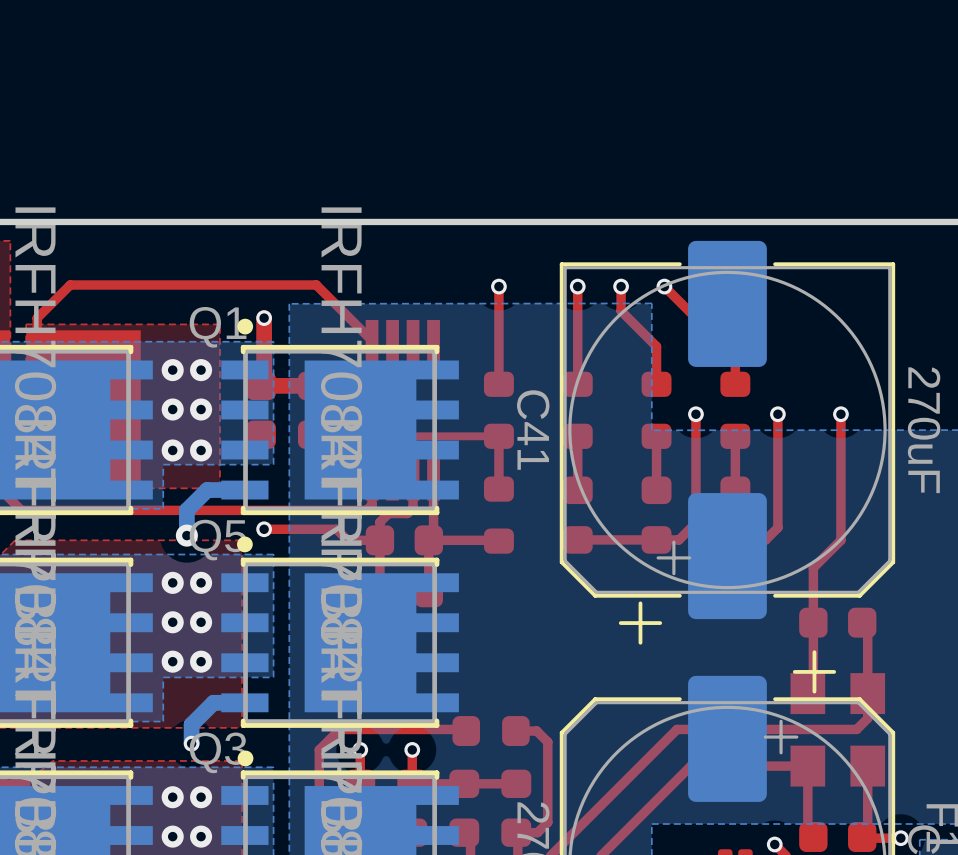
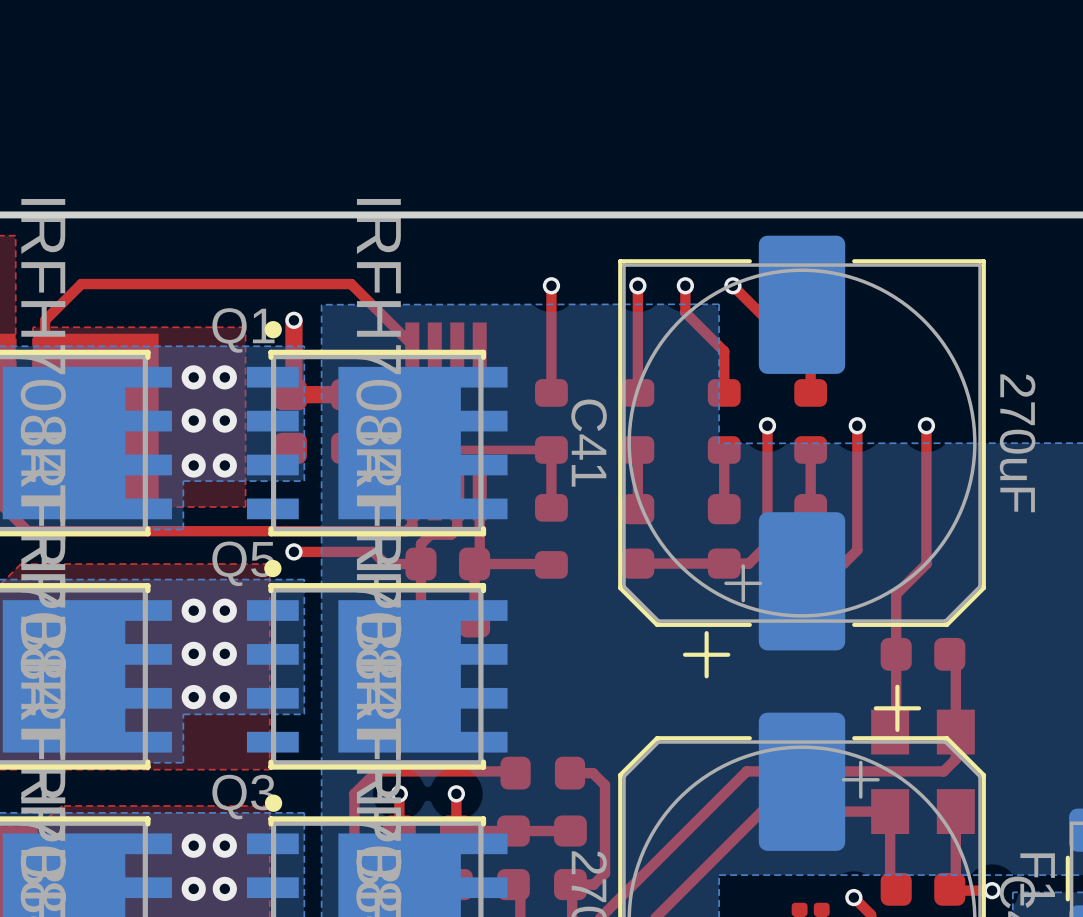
bottom track: (244, 490) (207, 490) (186, 510) (186, 535) -> none
via: (186, 535) -> none
bottom track: (244, 702) (213, 702) (191, 724) (191, 743) -> none
via: (191, 743) -> none

